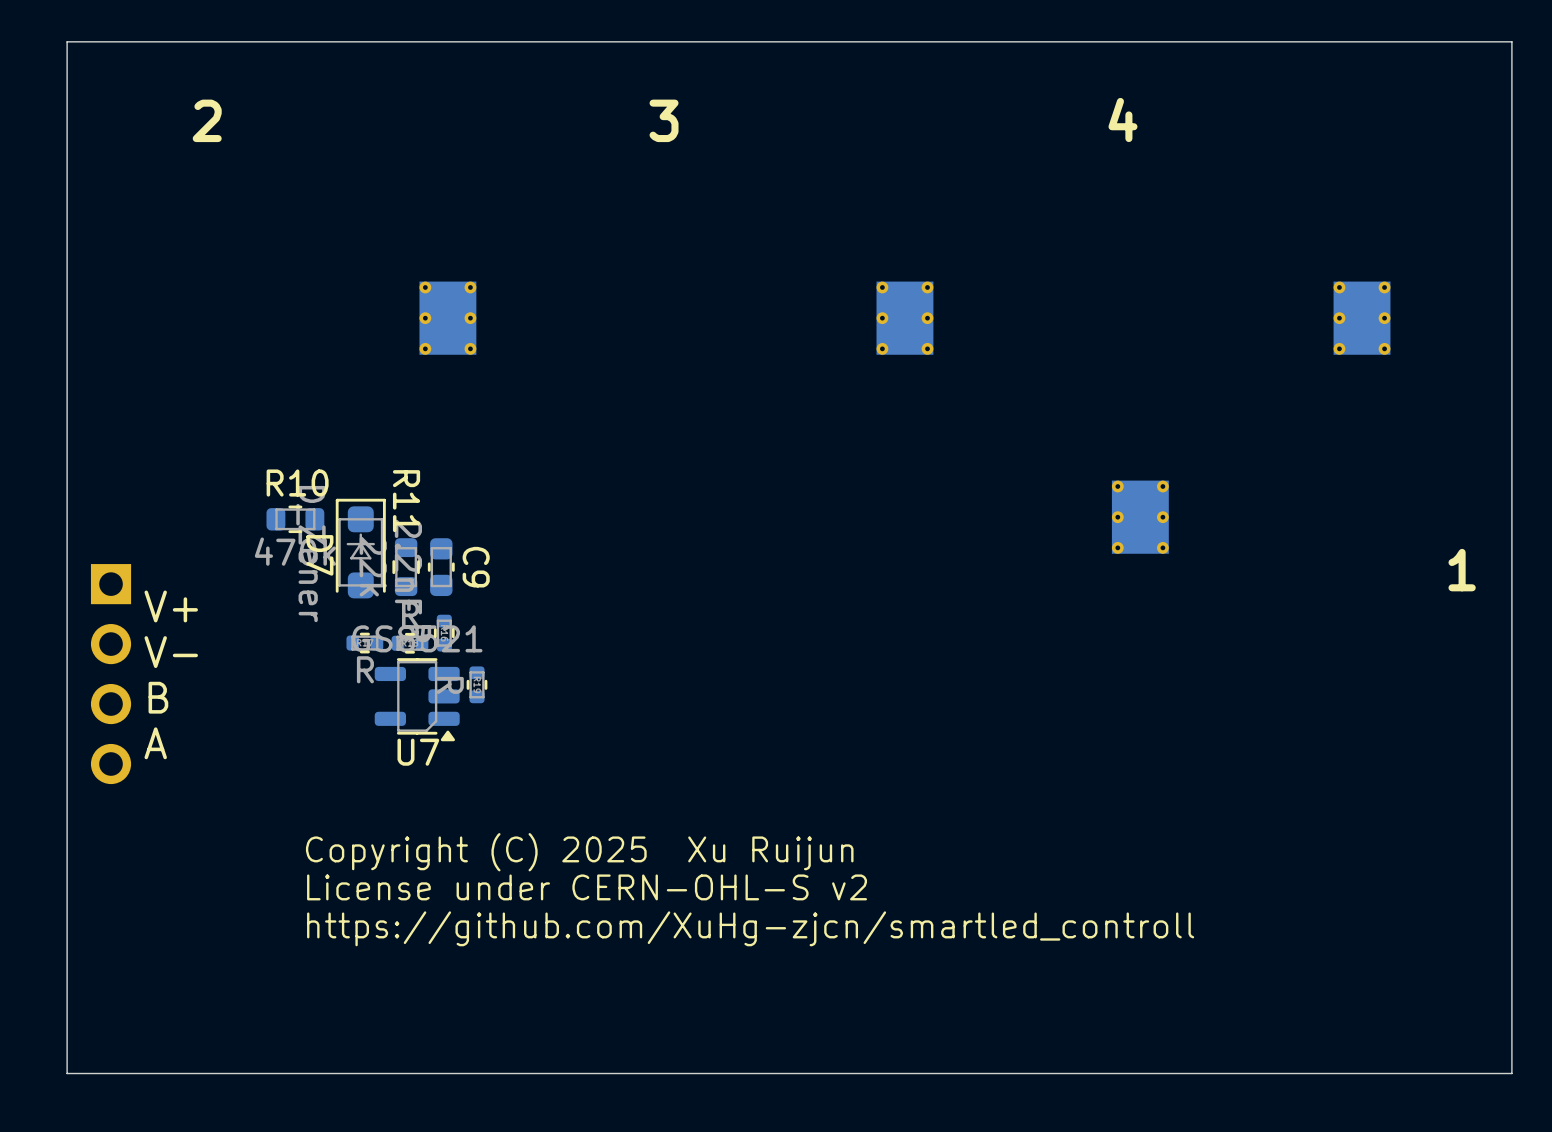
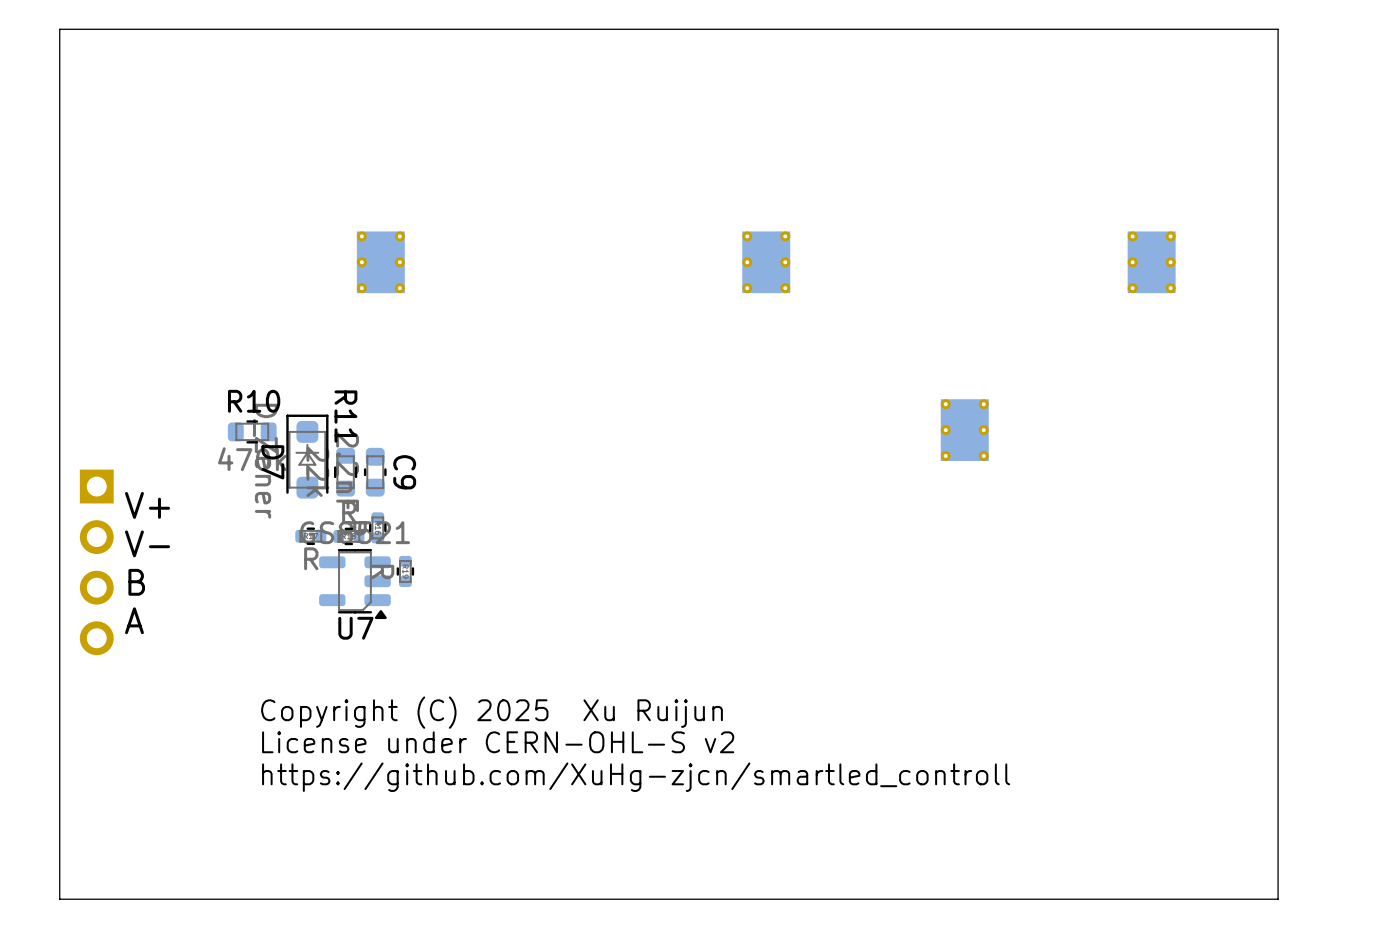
text: 2 (207, 120) -> none
text: 3 (664, 120) -> none
text: 4 (1122, 120) -> none
text: 1 (1462, 570) -> none

